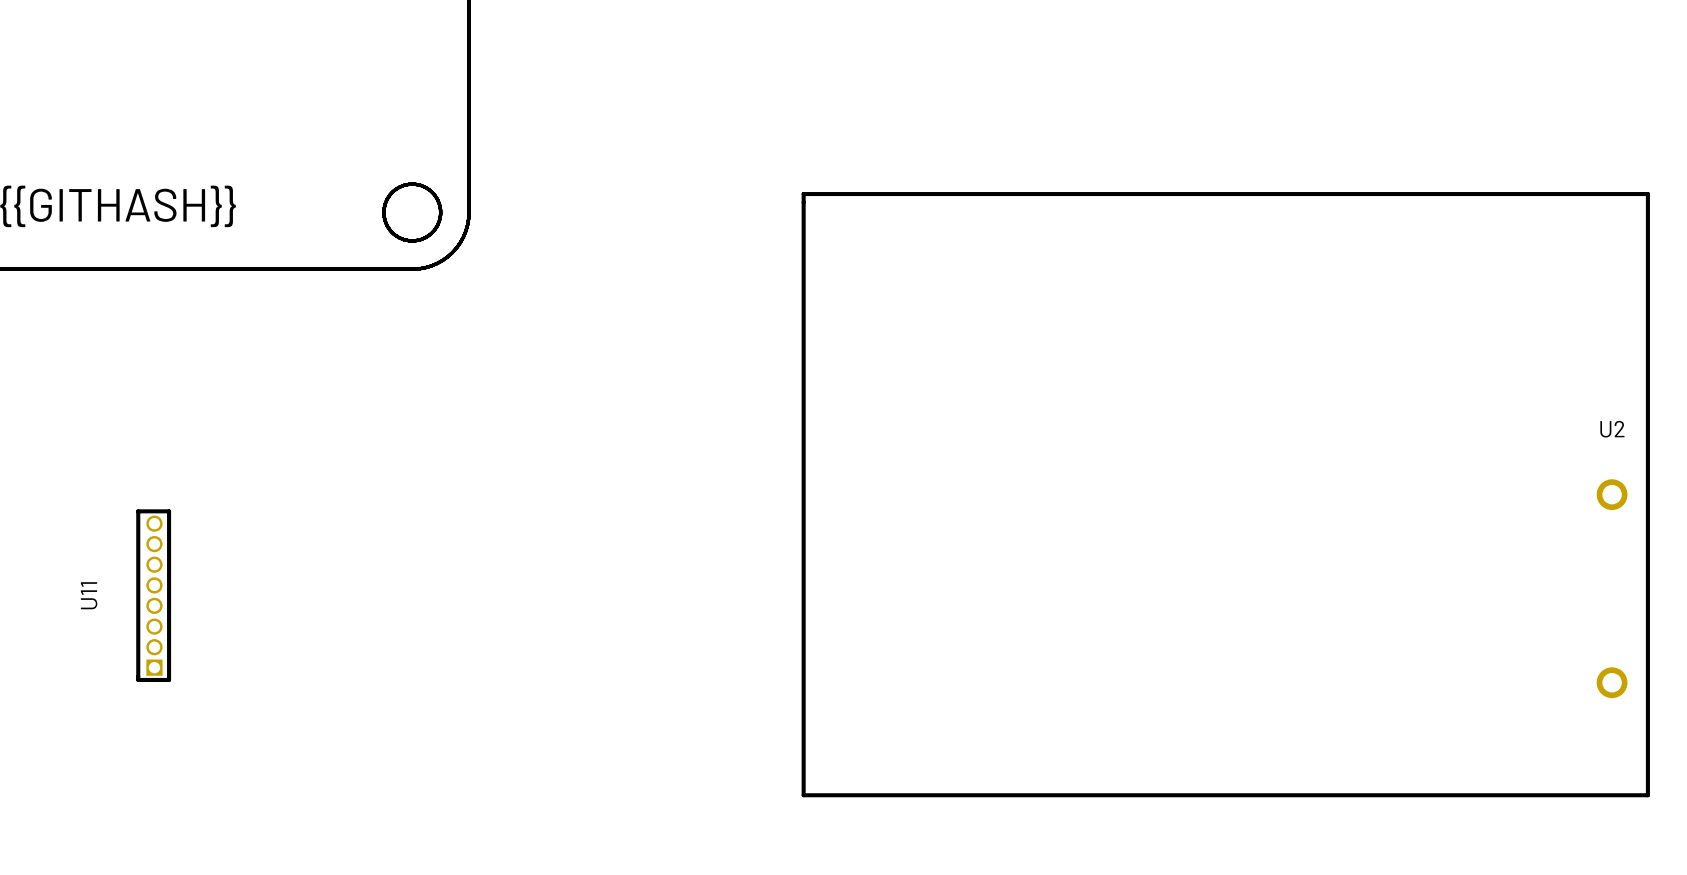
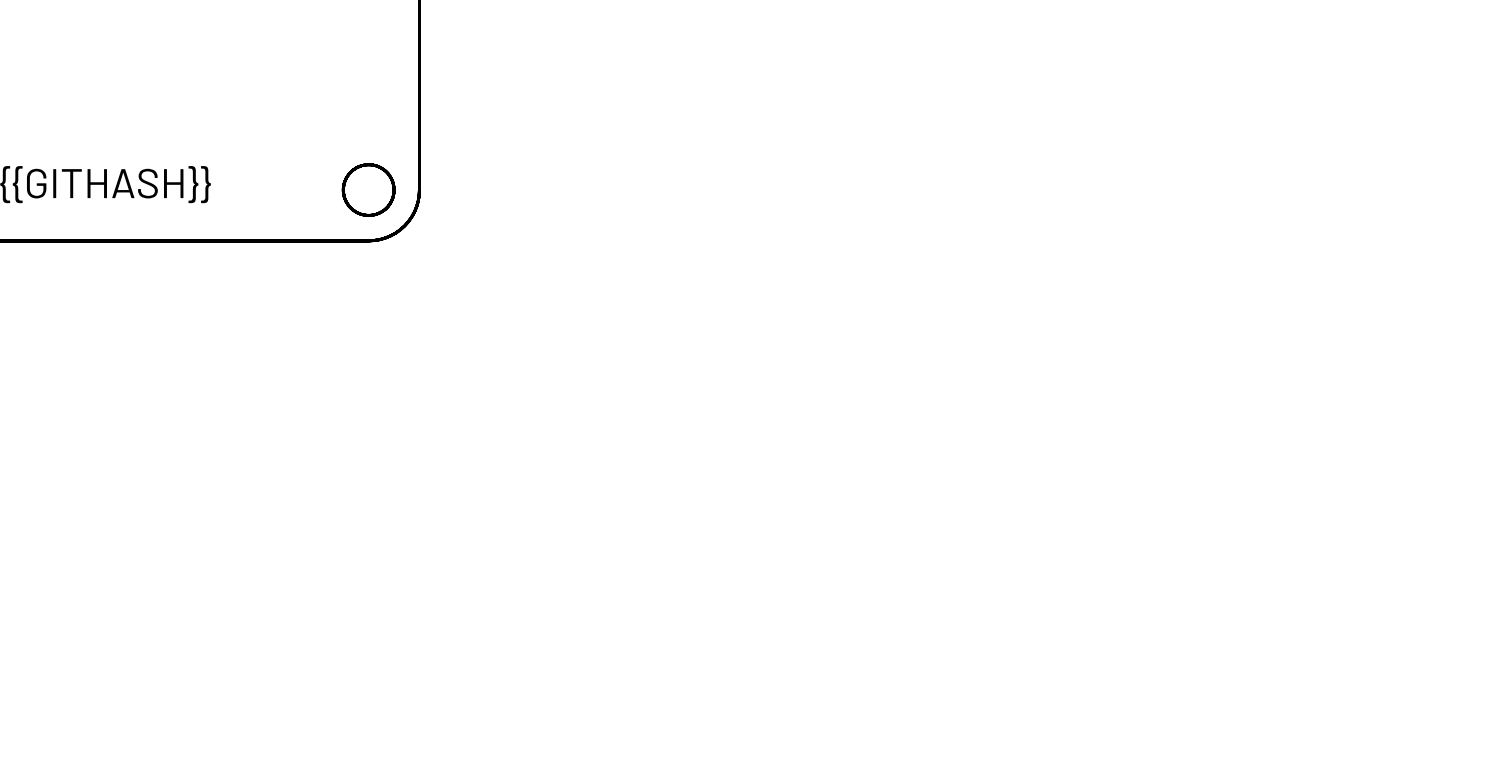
U2: (1225, 494) -> none
U11: (153, 595) -> none

